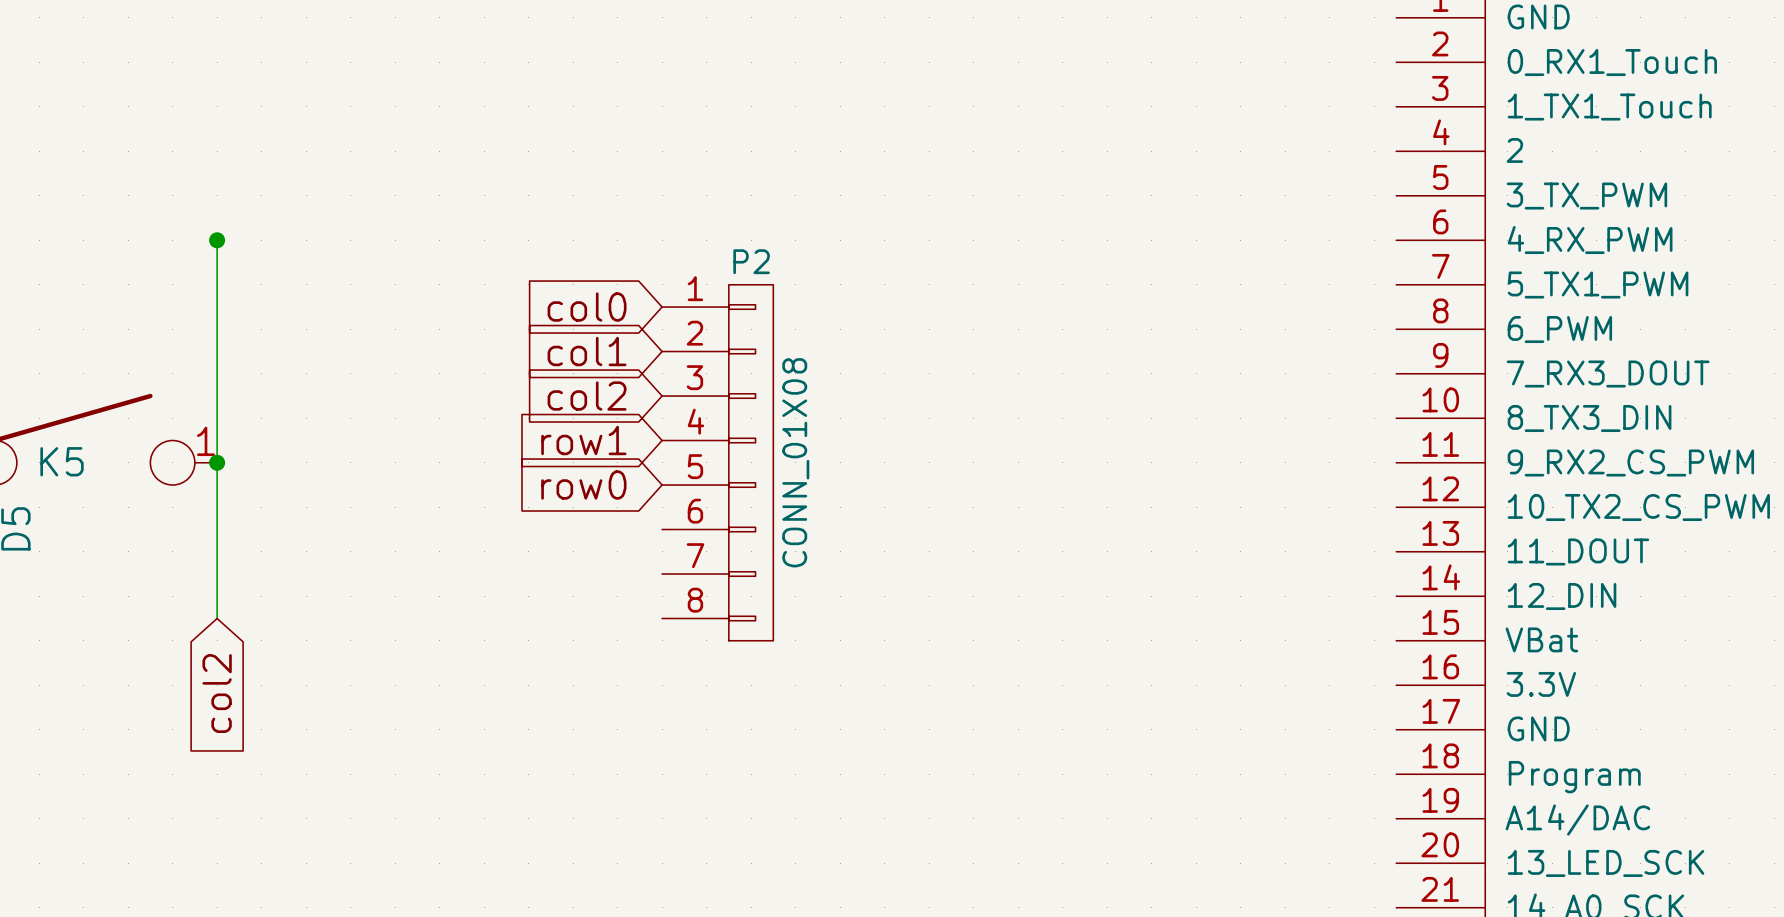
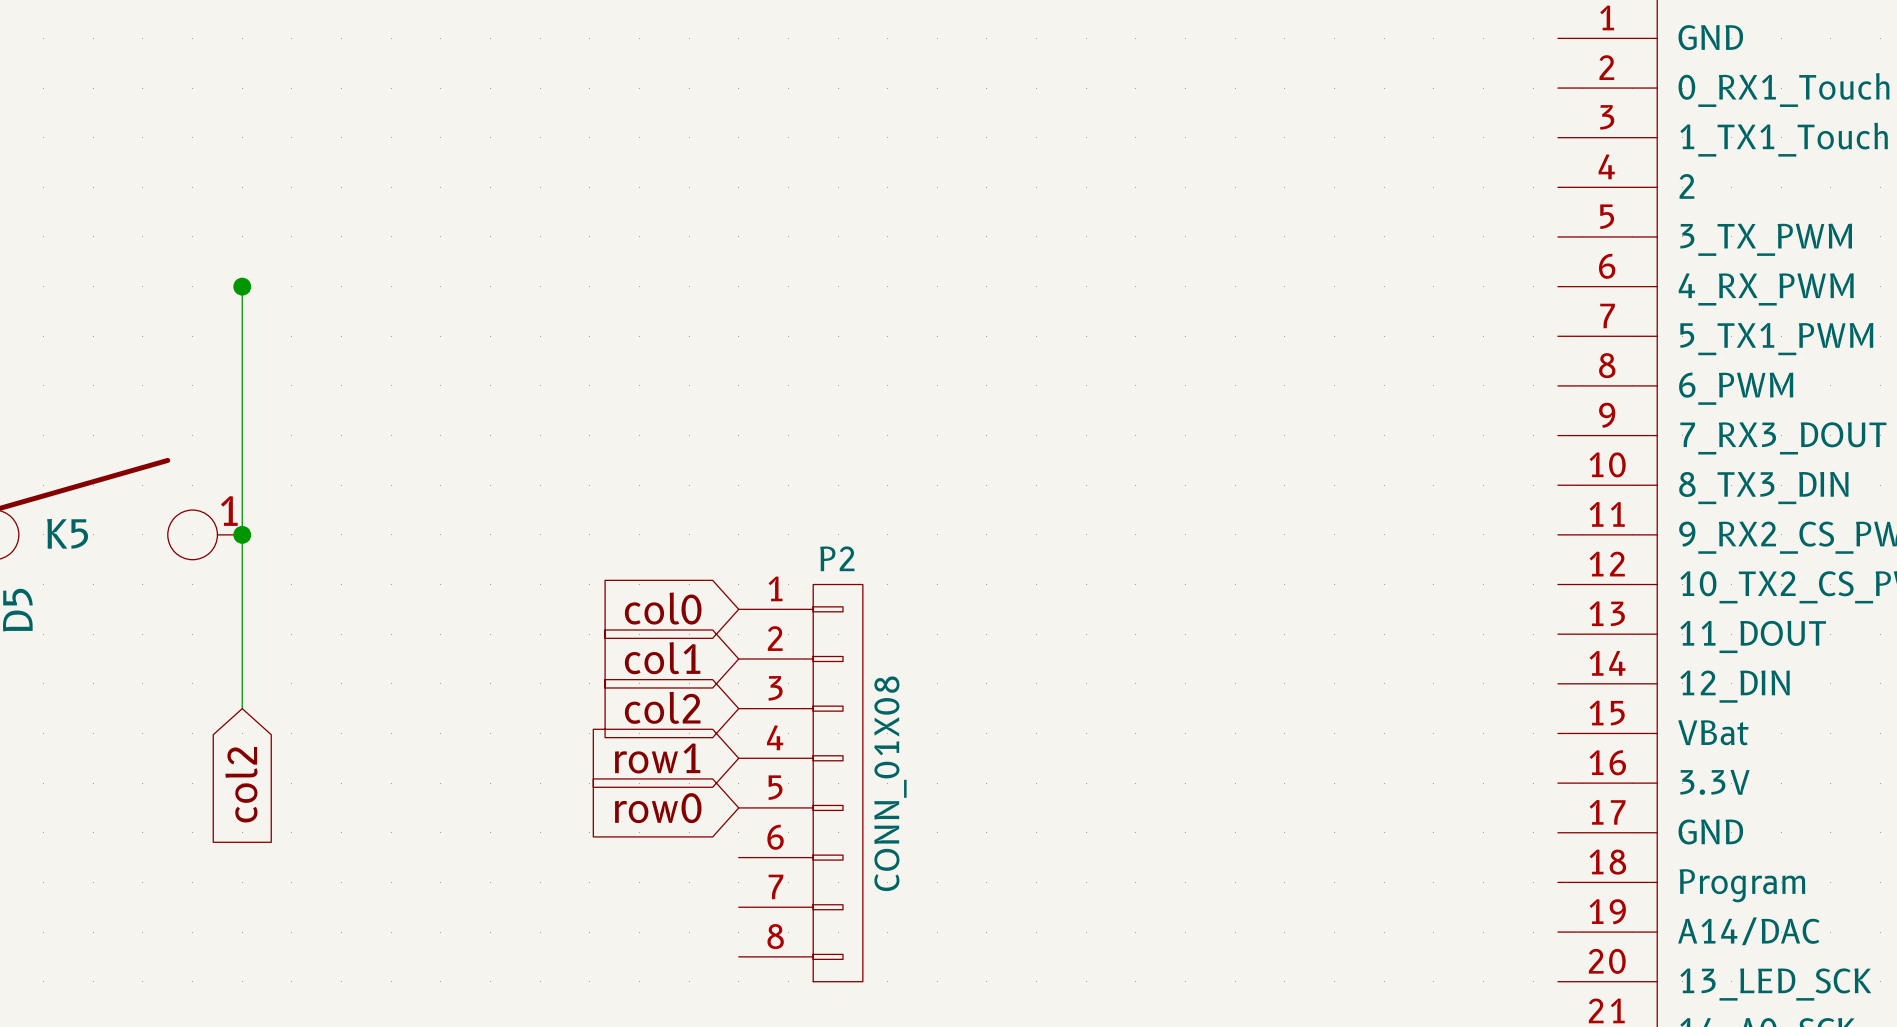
global label position: col0 (587, 307) -> col0 (663, 608)
global label position: col1 (587, 351) -> col1 (662, 658)
global label position: col2 (587, 396) -> col2 (662, 707)
global label position: row1 (583, 440) -> row1 (657, 758)
P2 position: (717, 462) -> (800, 783)
global label position: row0 (583, 485) -> row0 (658, 808)

